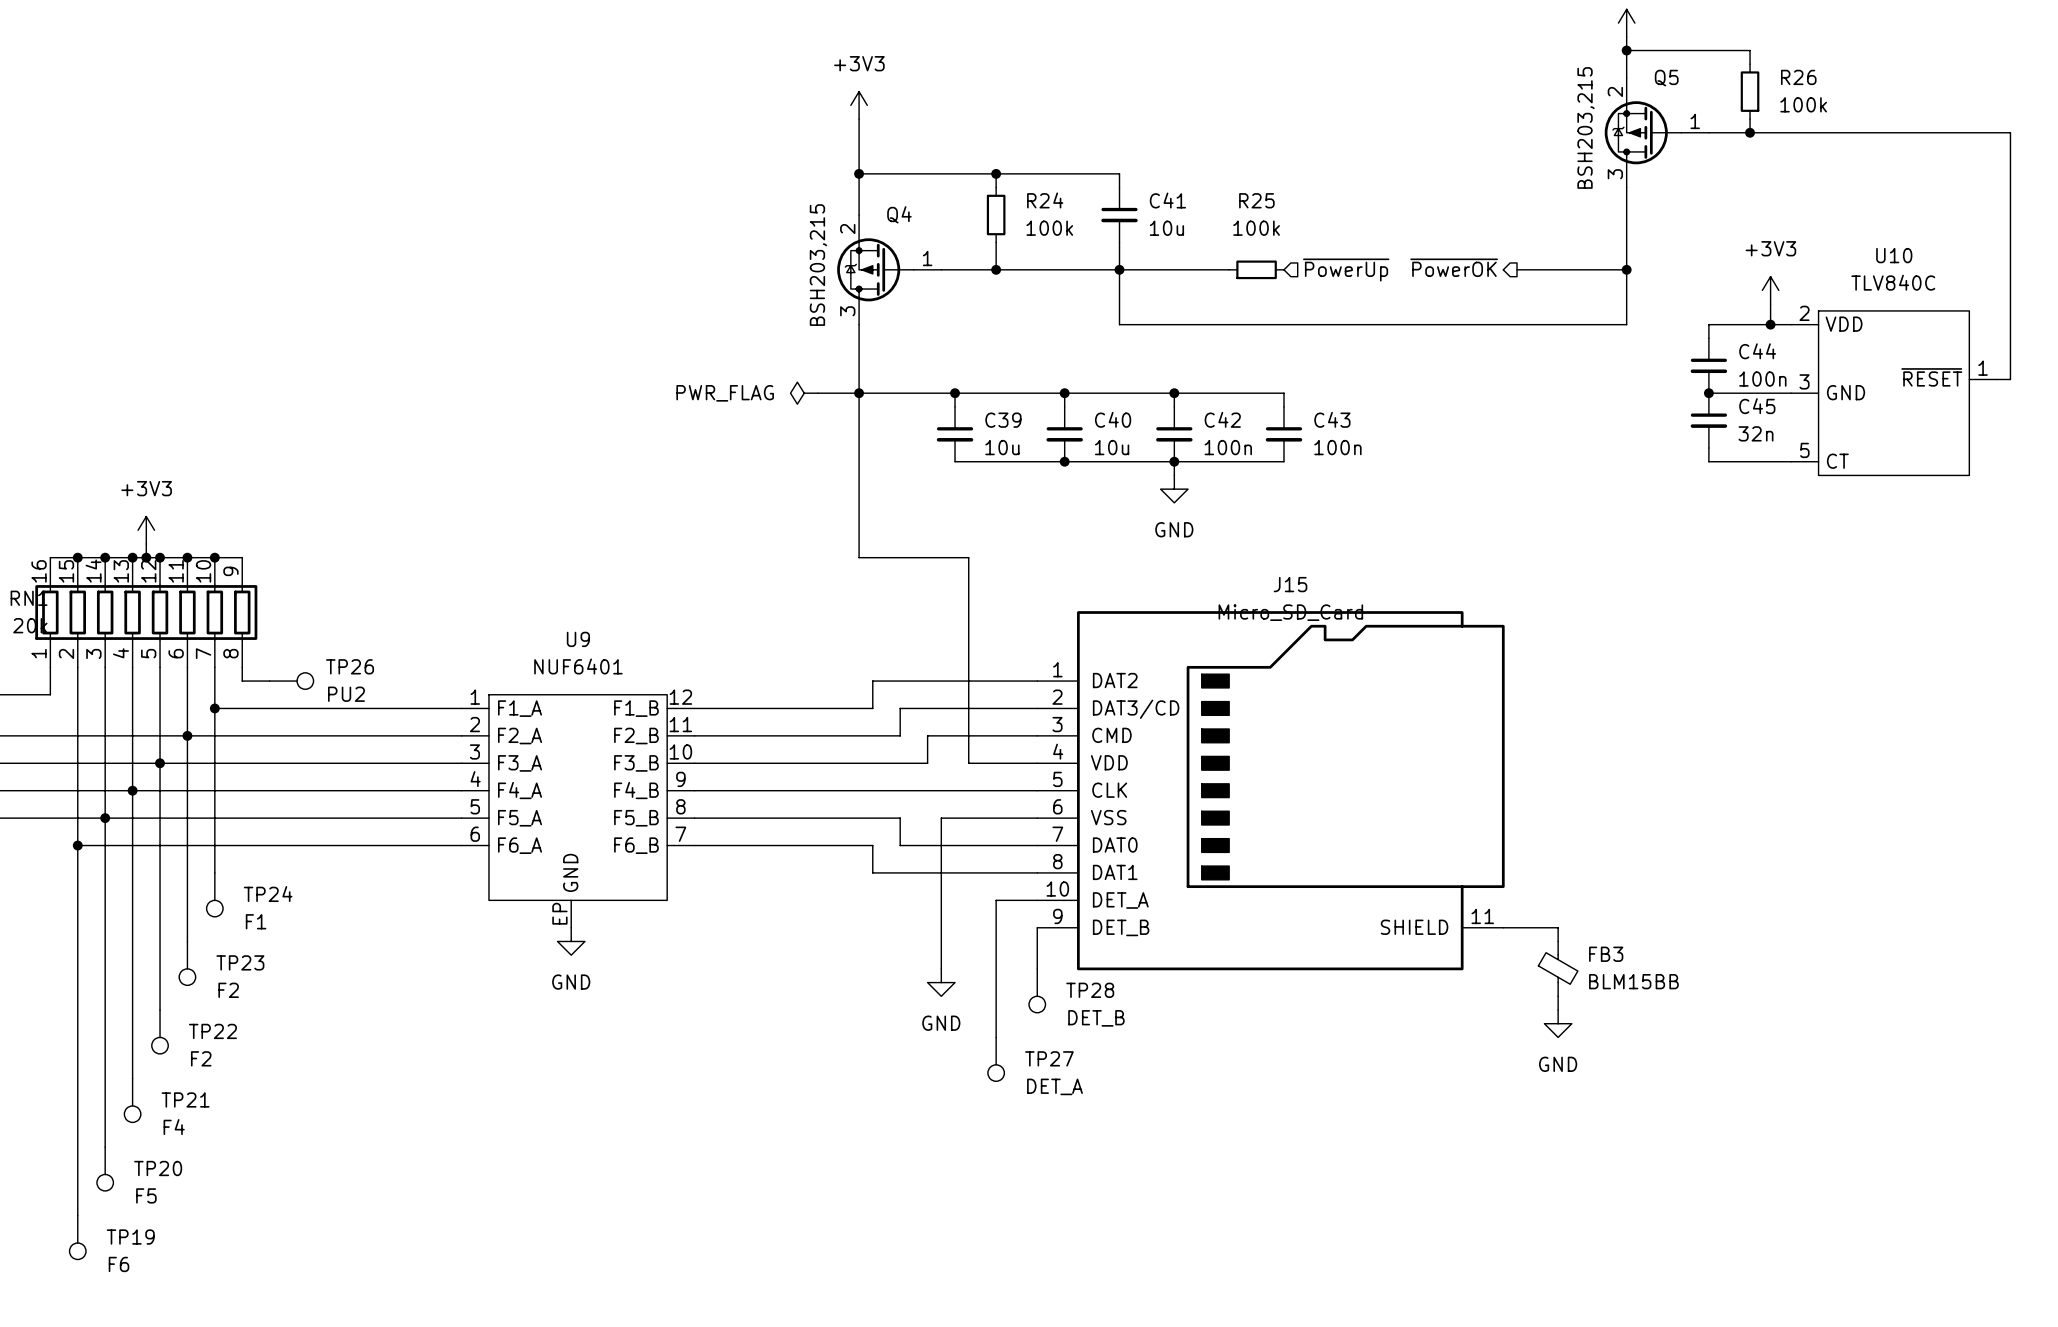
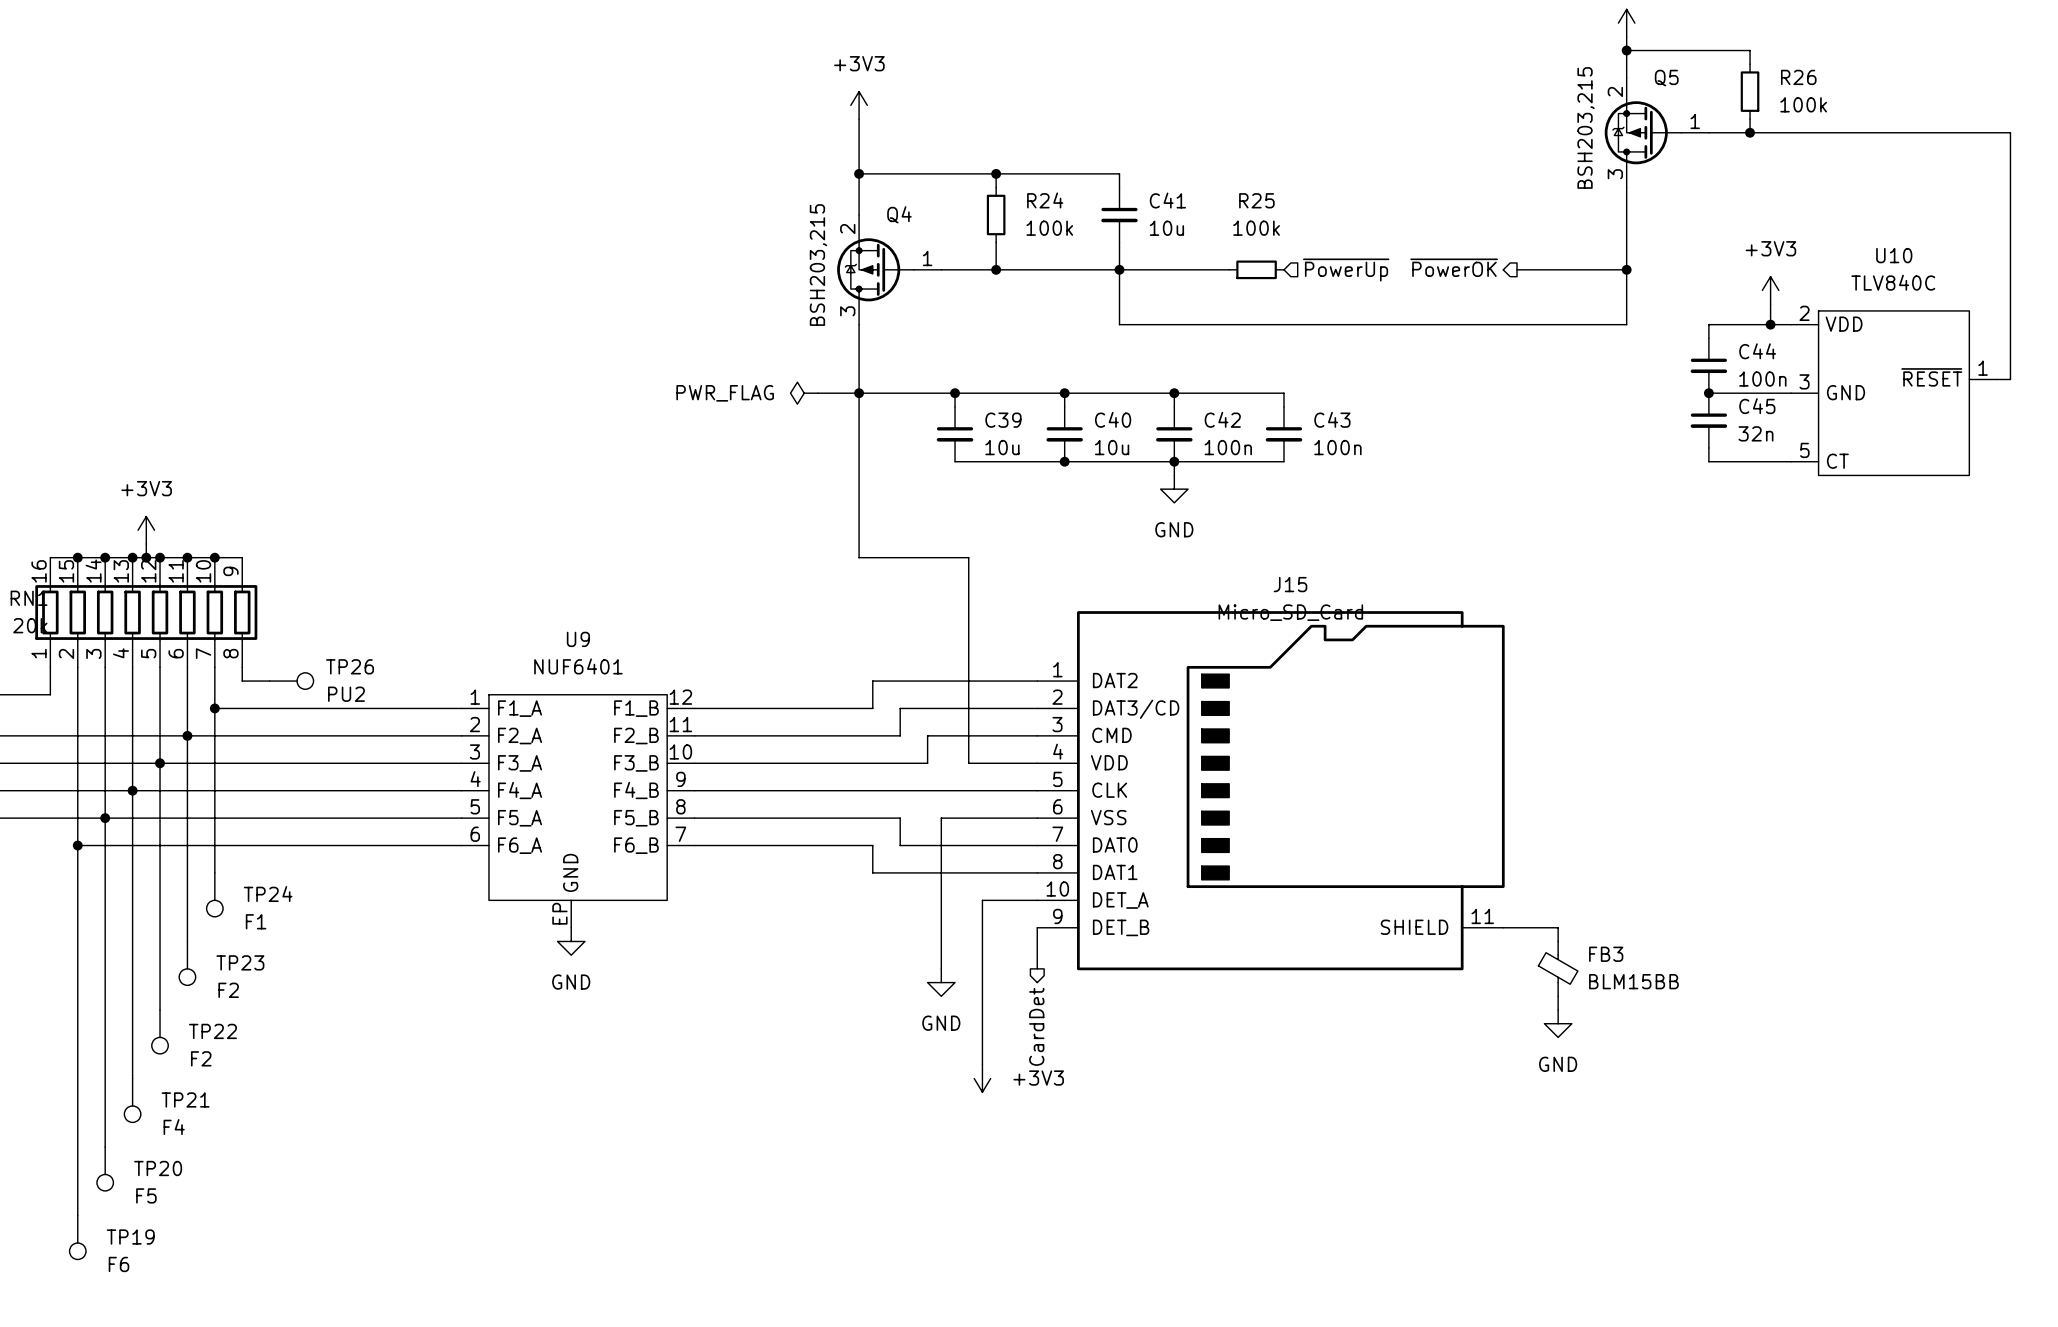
wire: (996, 900) (996, 1037) -> (996, 900) (982, 900) (982, 1064)
TP28: DET_B (1037, 990) -> none
hierarchical label: none -> CardDet (1036, 1026)
TP27: DET_A (996, 1059) -> none
power symbol: none -> +3V3 (982, 1078)

